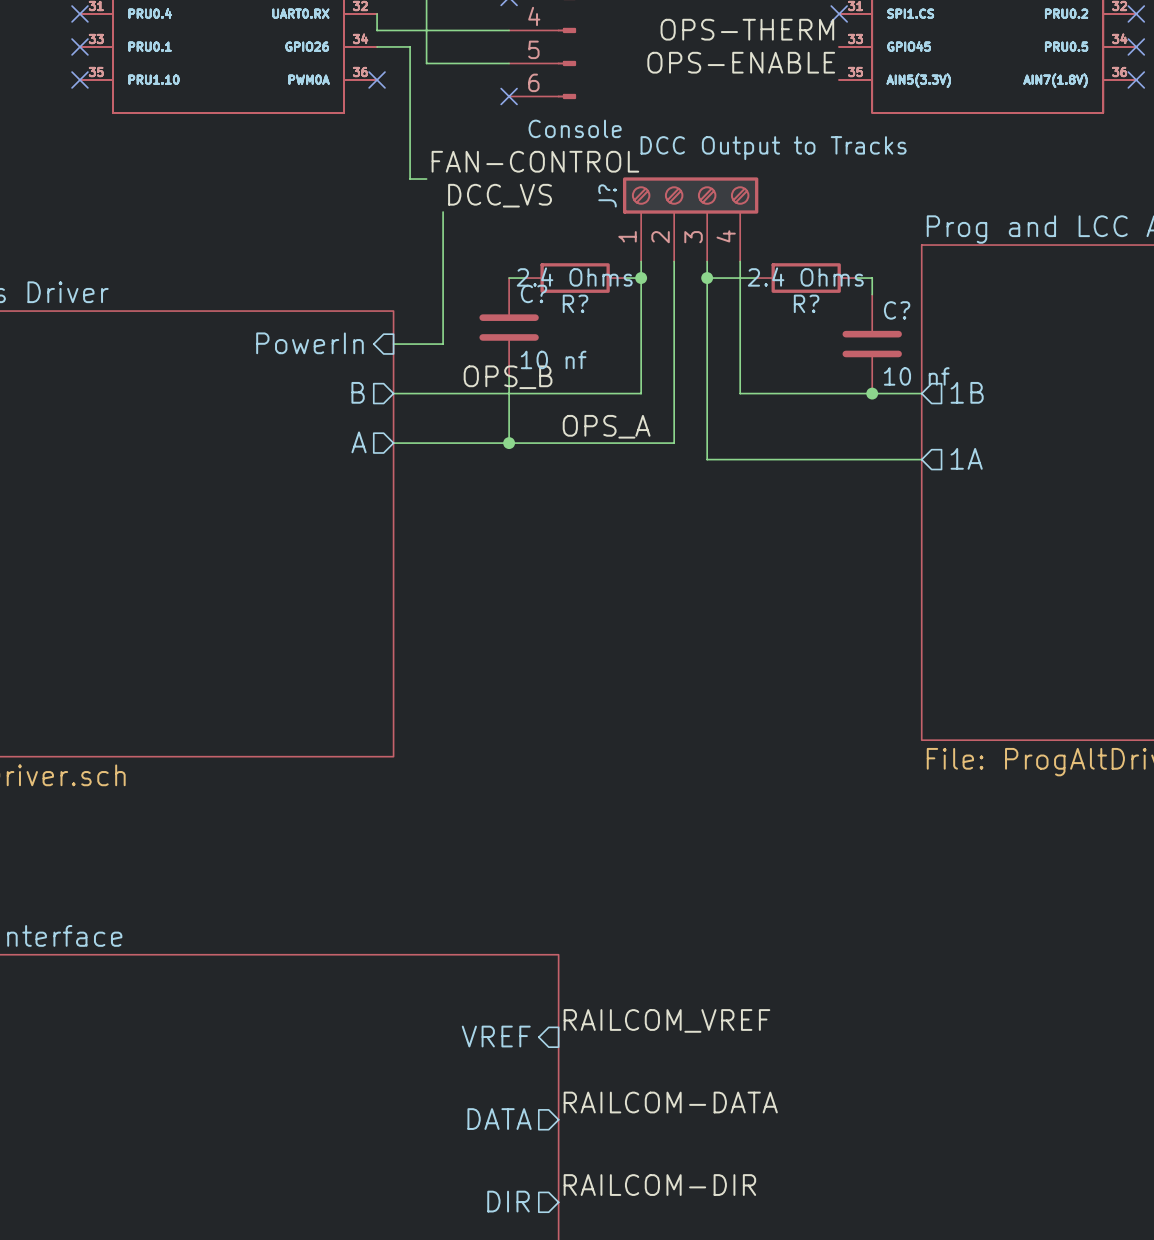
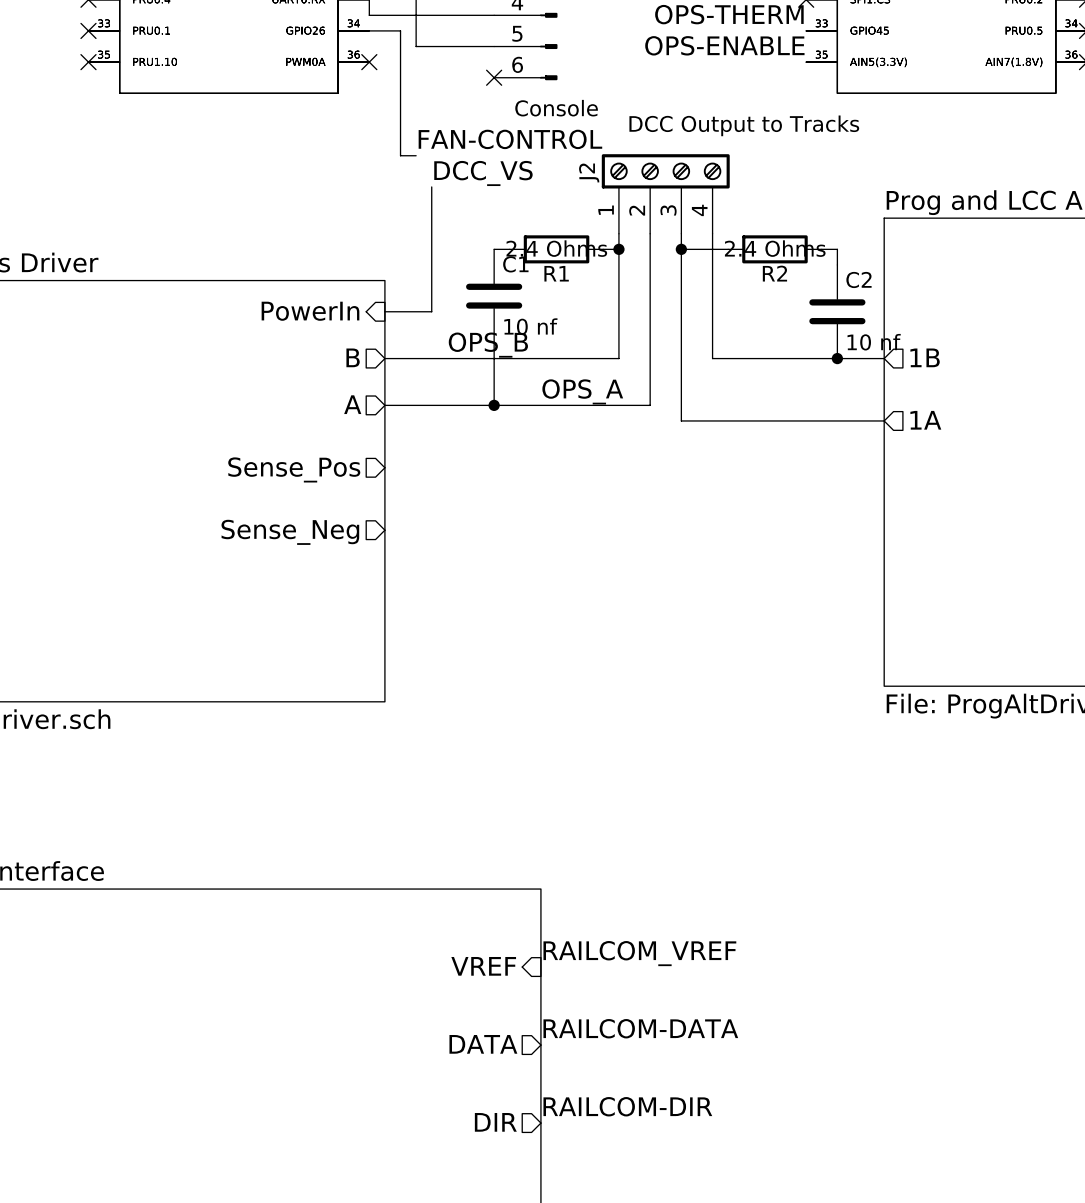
J? name: J? (607, 195) -> J2 (589, 172)
C? name: C? (533, 293) -> C1 (515, 264)
R? name: R? (575, 303) -> R1 (556, 273)
R? name: R? (806, 303) -> R2 (774, 273)
C? name: C? (897, 310) -> C2 (858, 279)
sheet pin: none -> Sense_Pos (294, 469)
sheet pin: none -> Sense_Neg (290, 532)

